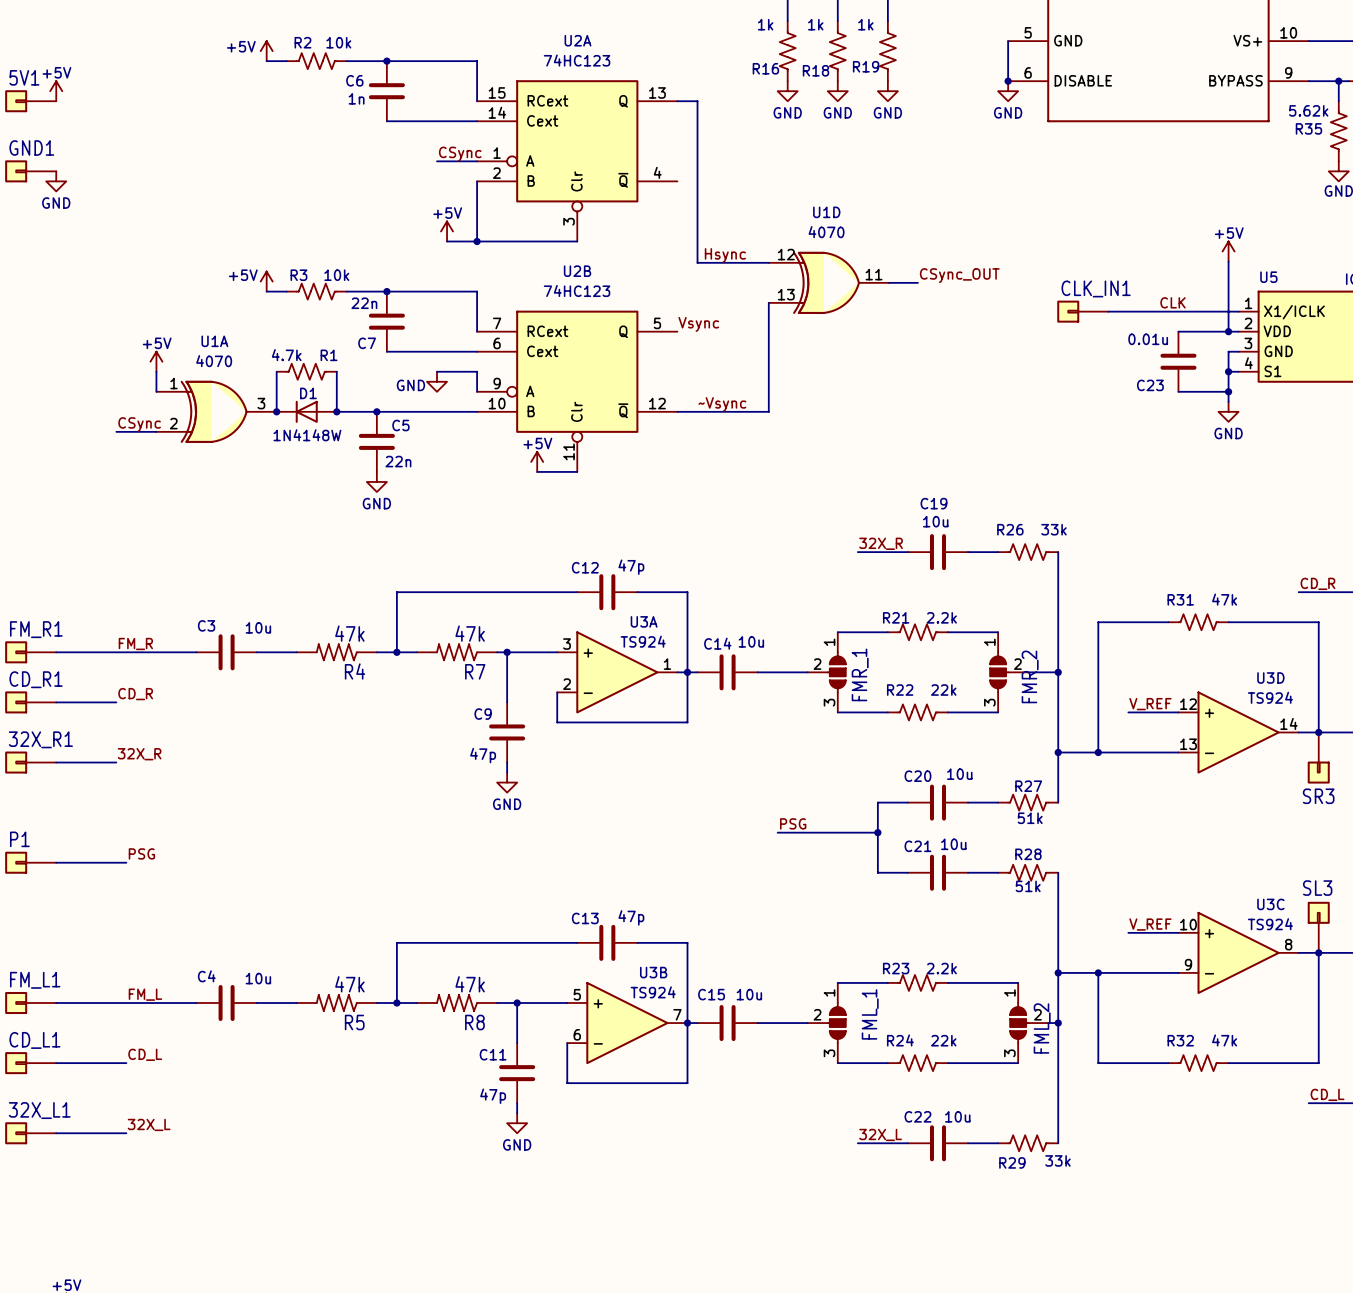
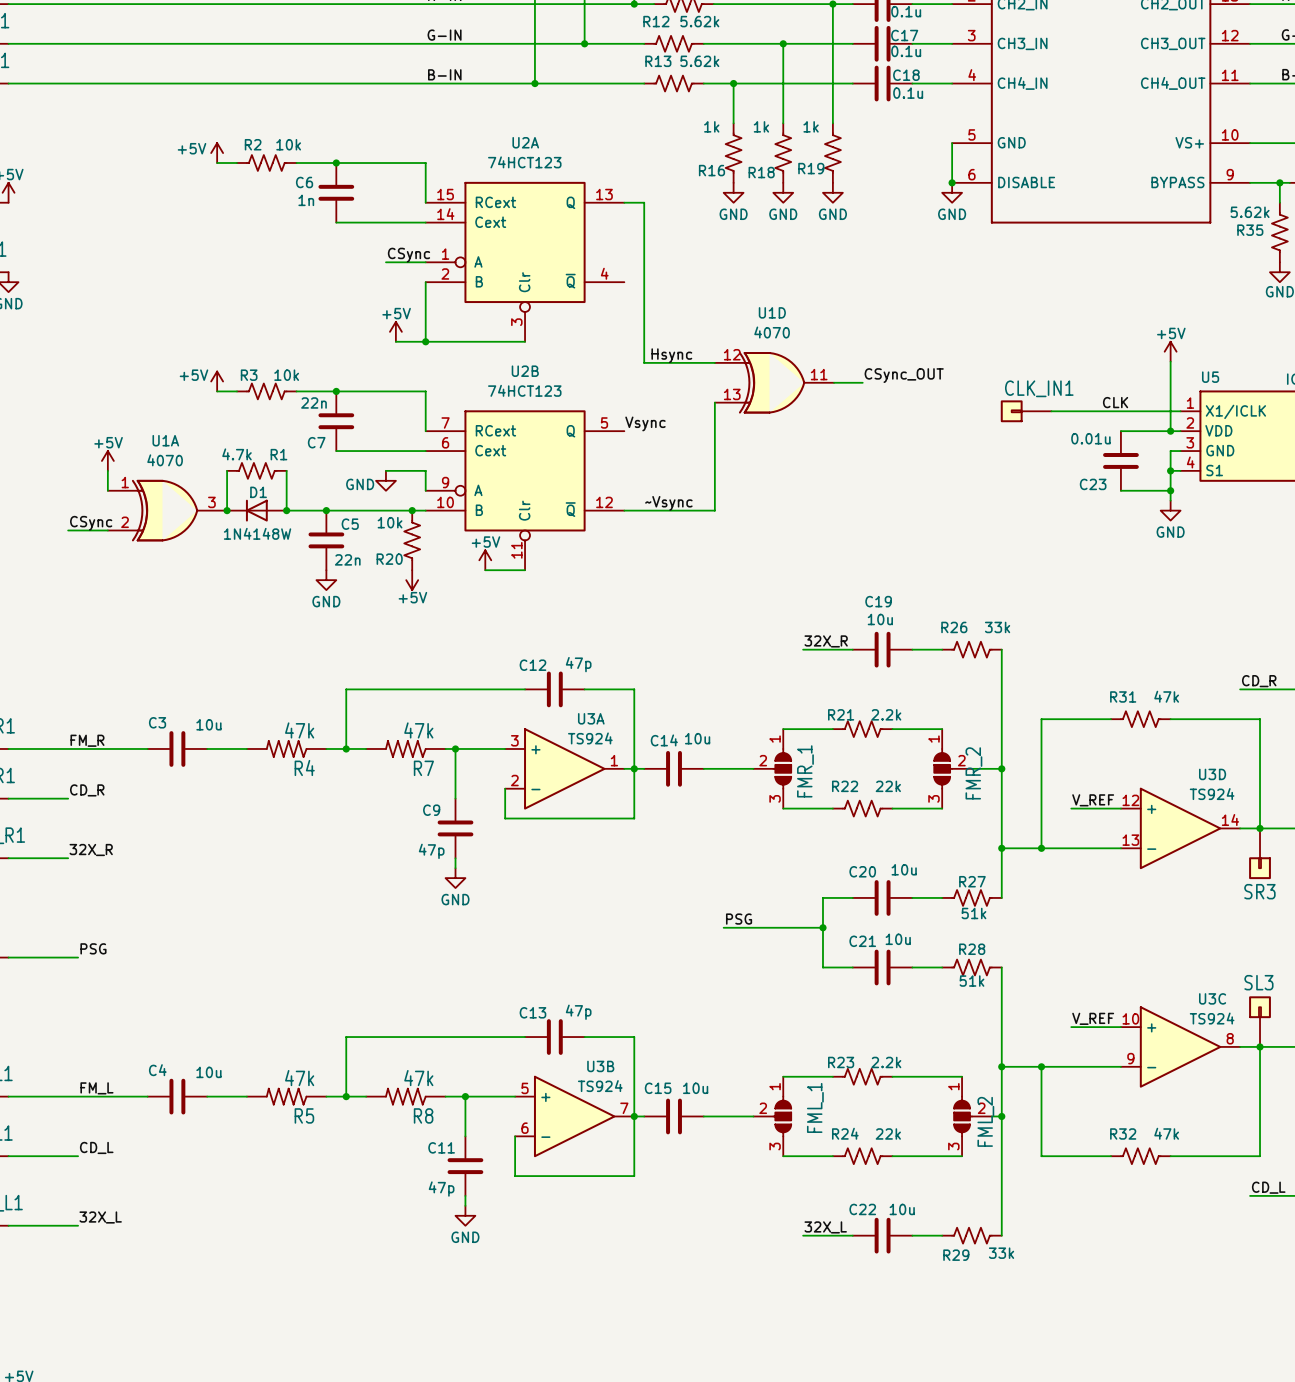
U2A value: 74HC123 (577, 60) -> 74HCT123 (524, 162)
U2B value: 74HC123 (577, 290) -> 74HCT123 (524, 390)
junction: none -> (412, 510)
R20: none -> 10k (412, 540)
power symbol: none -> +5V (412, 580)

